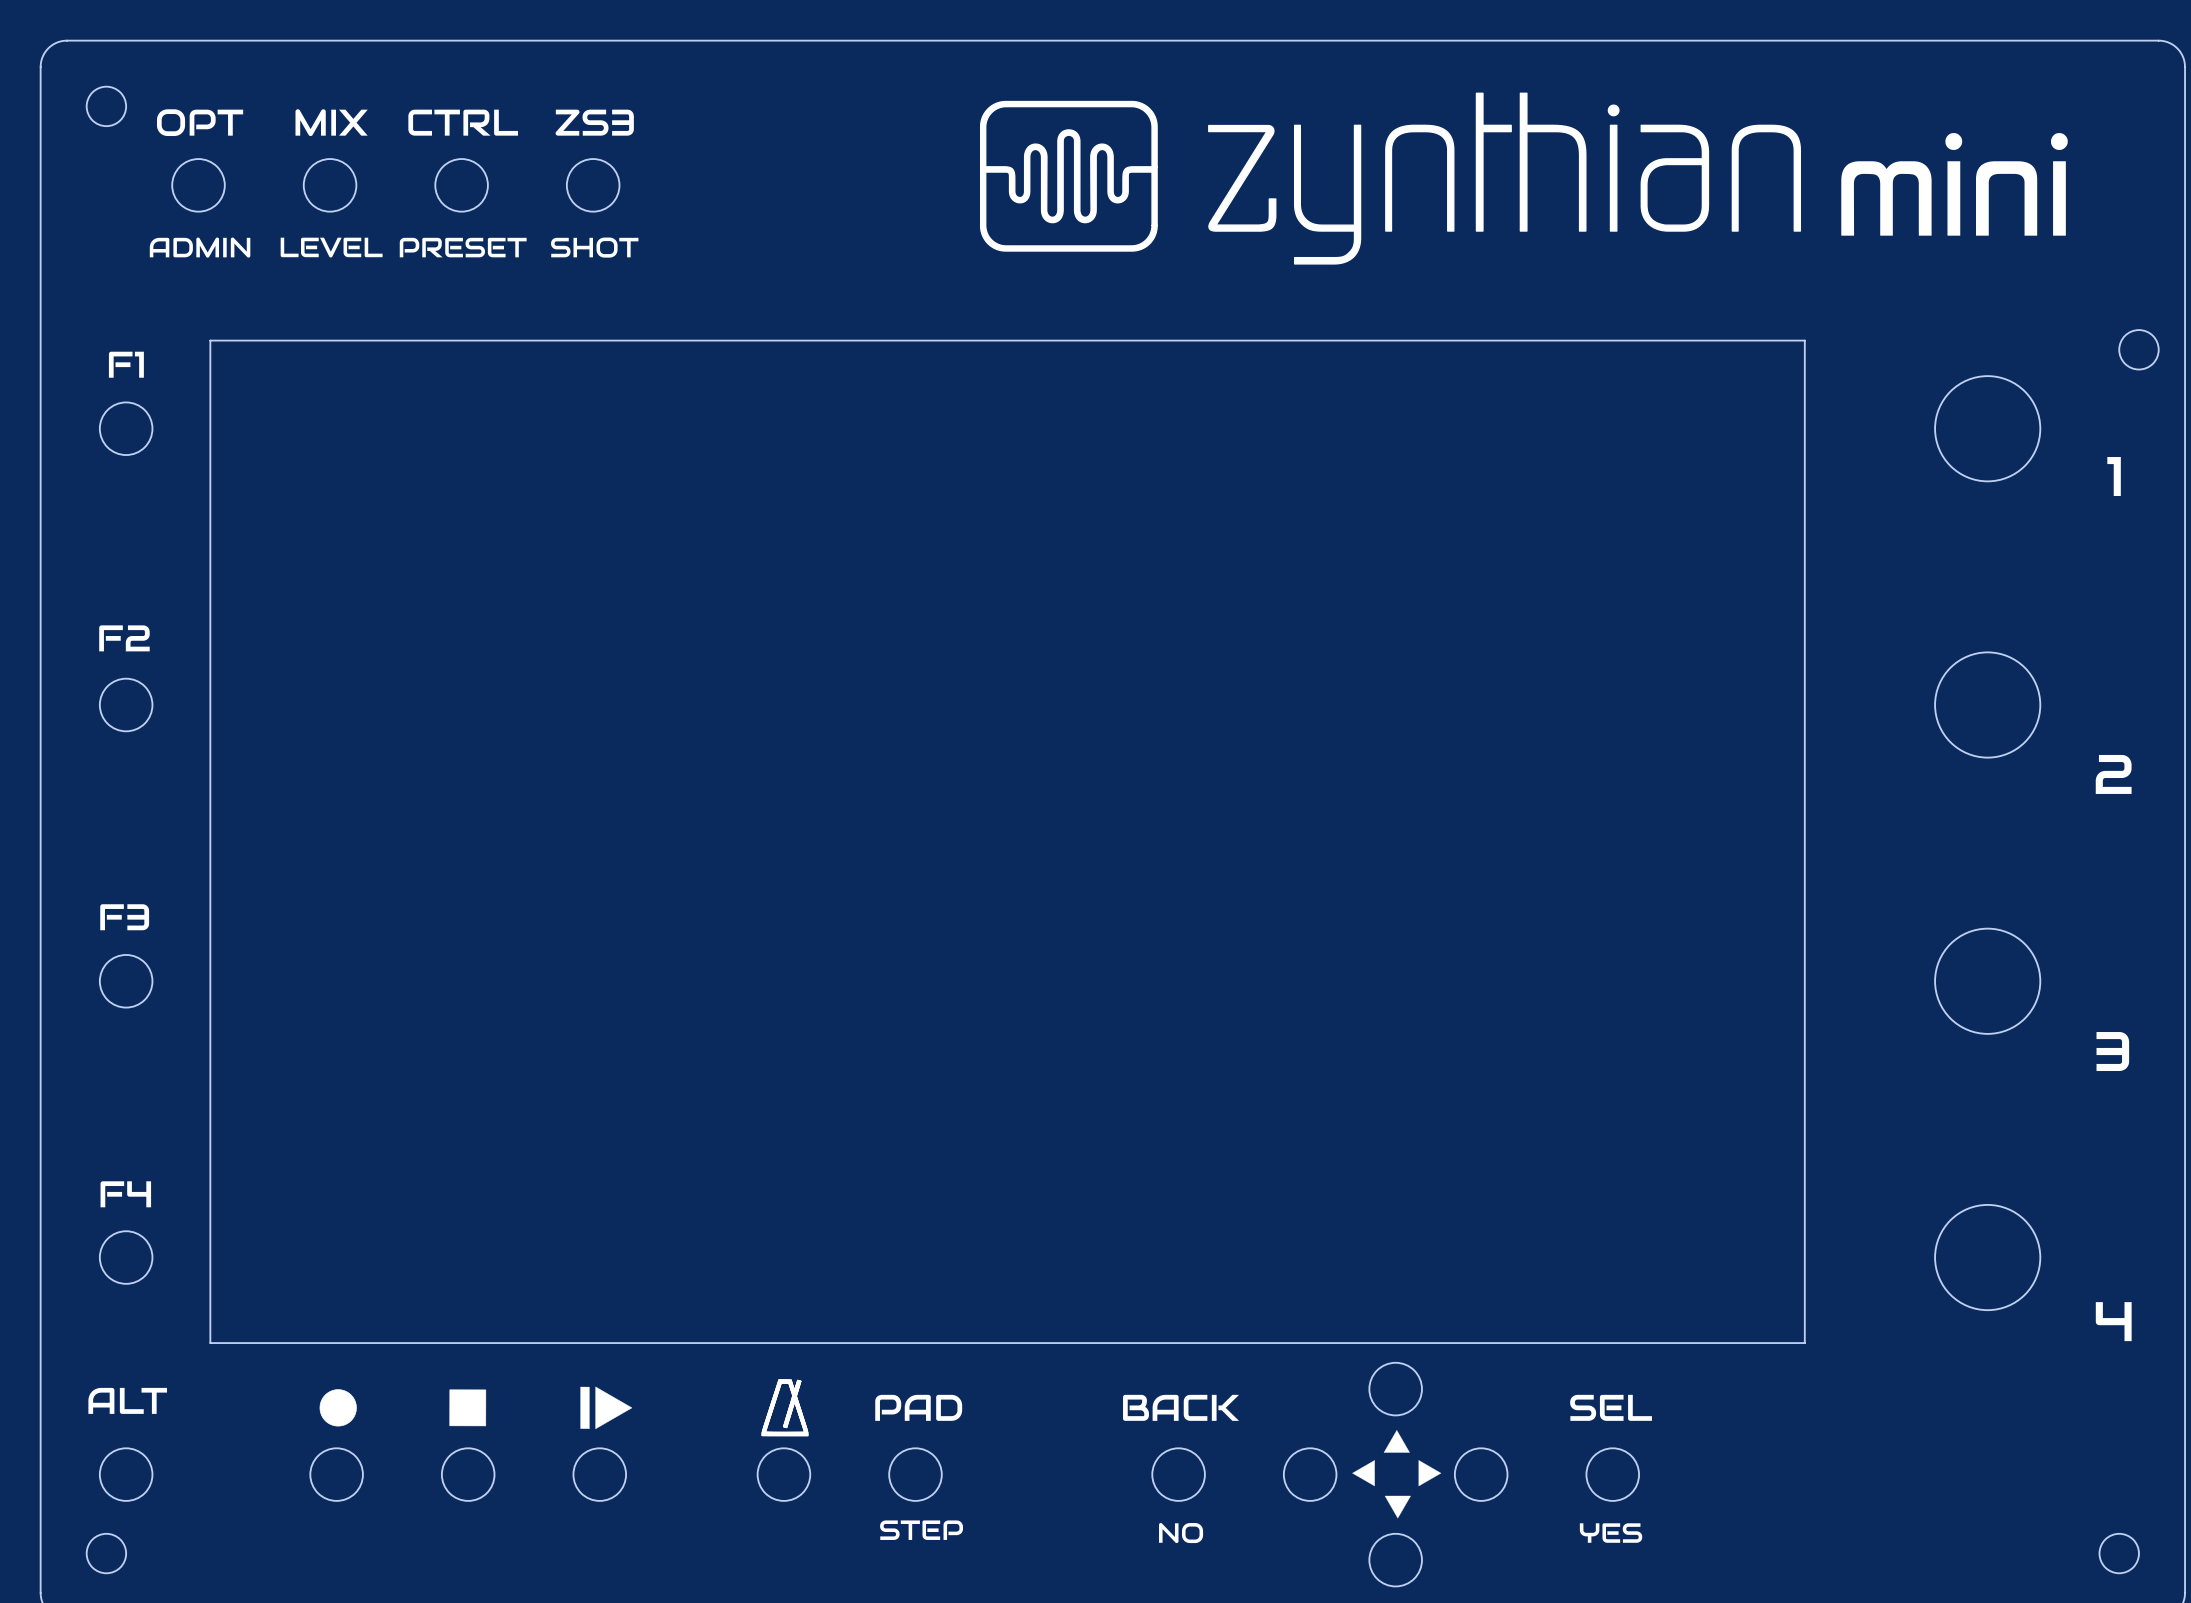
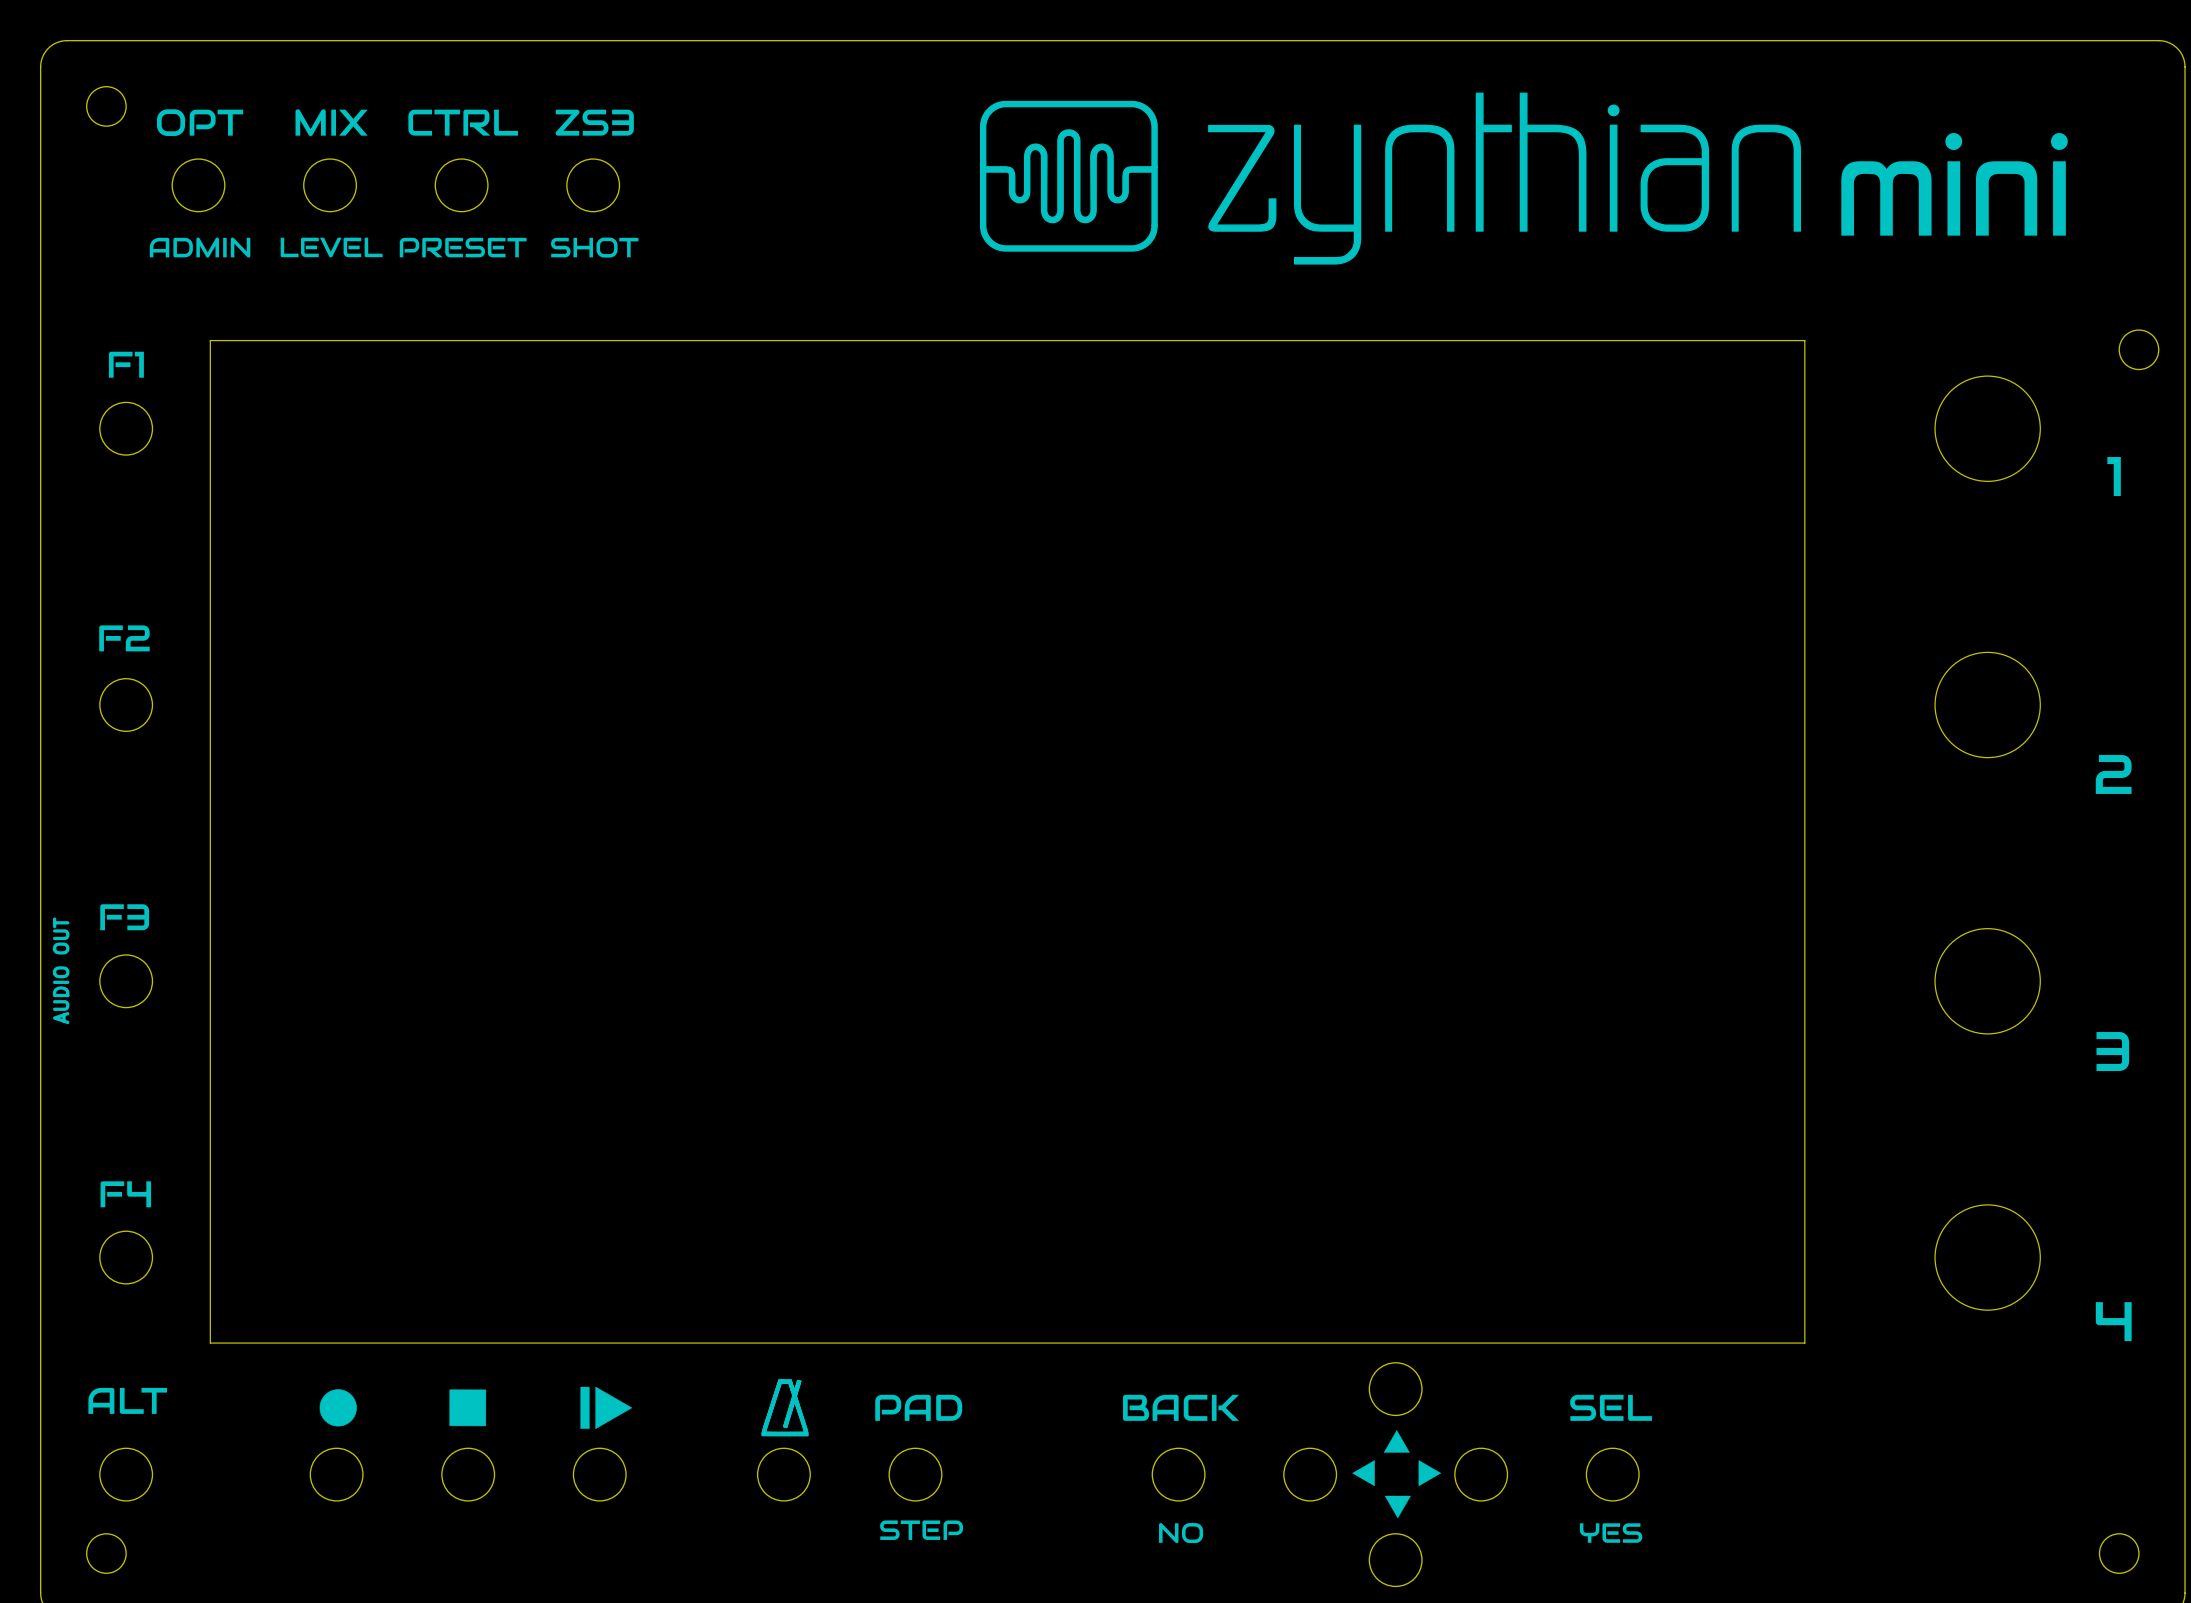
text: none -> AUDIO OUT (61, 970)

